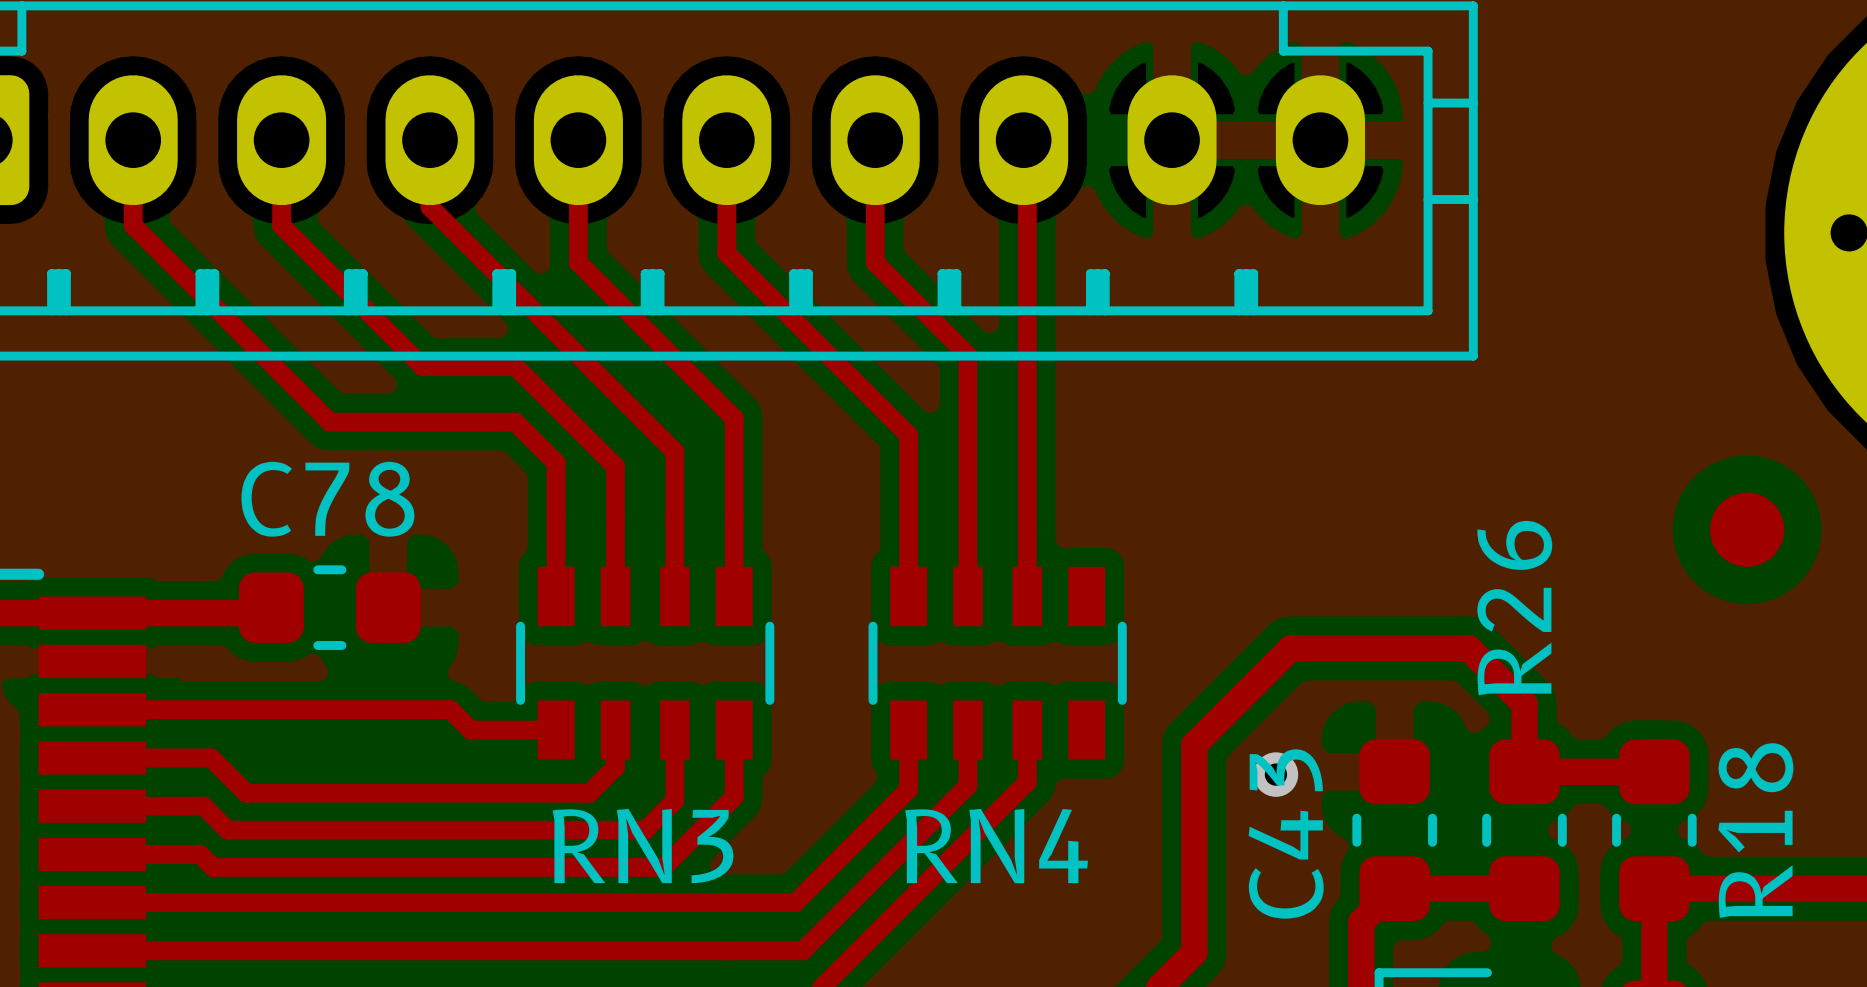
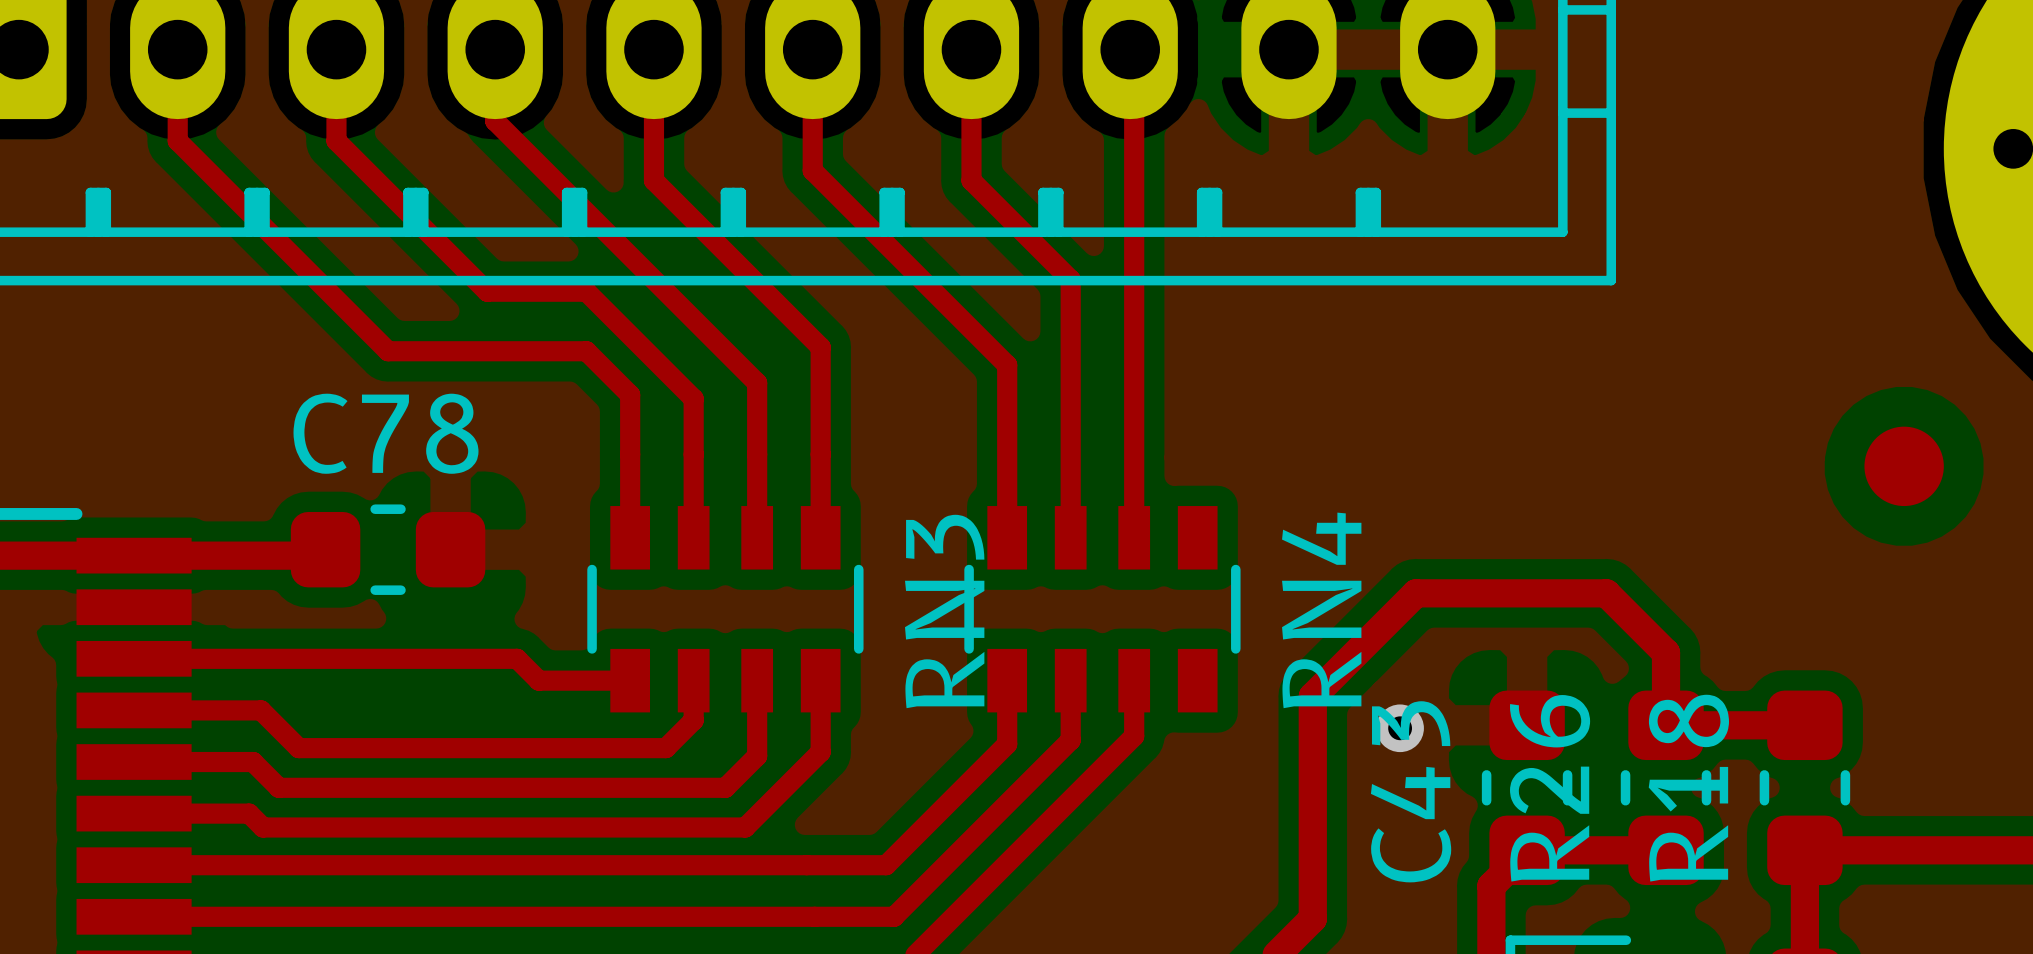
R26 name position: R26 (1514, 608) -> R26 (1550, 788)
R18 name position: R18 (1755, 830) -> R18 (1688, 788)
RN3 name rotation: 0° (643, 846) -> 90° counterclockwise (944, 611)
RN3 name position: RN3 (643, 846) -> RN3 (944, 611)
RN4 name rotation: 0° (996, 846) -> 90° counterclockwise (1321, 610)
RN4 name position: RN4 (996, 846) -> RN4 (1321, 610)

